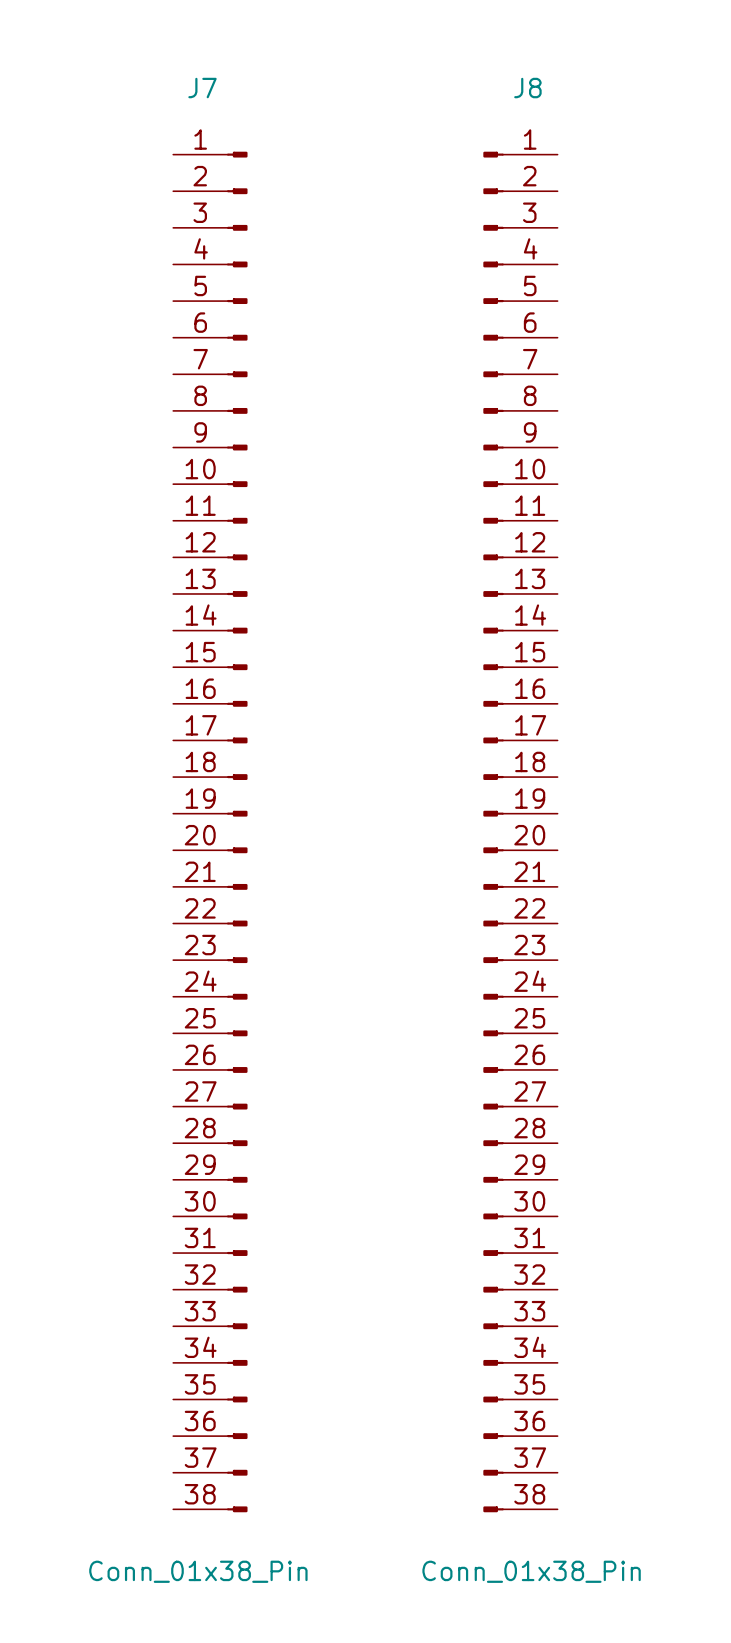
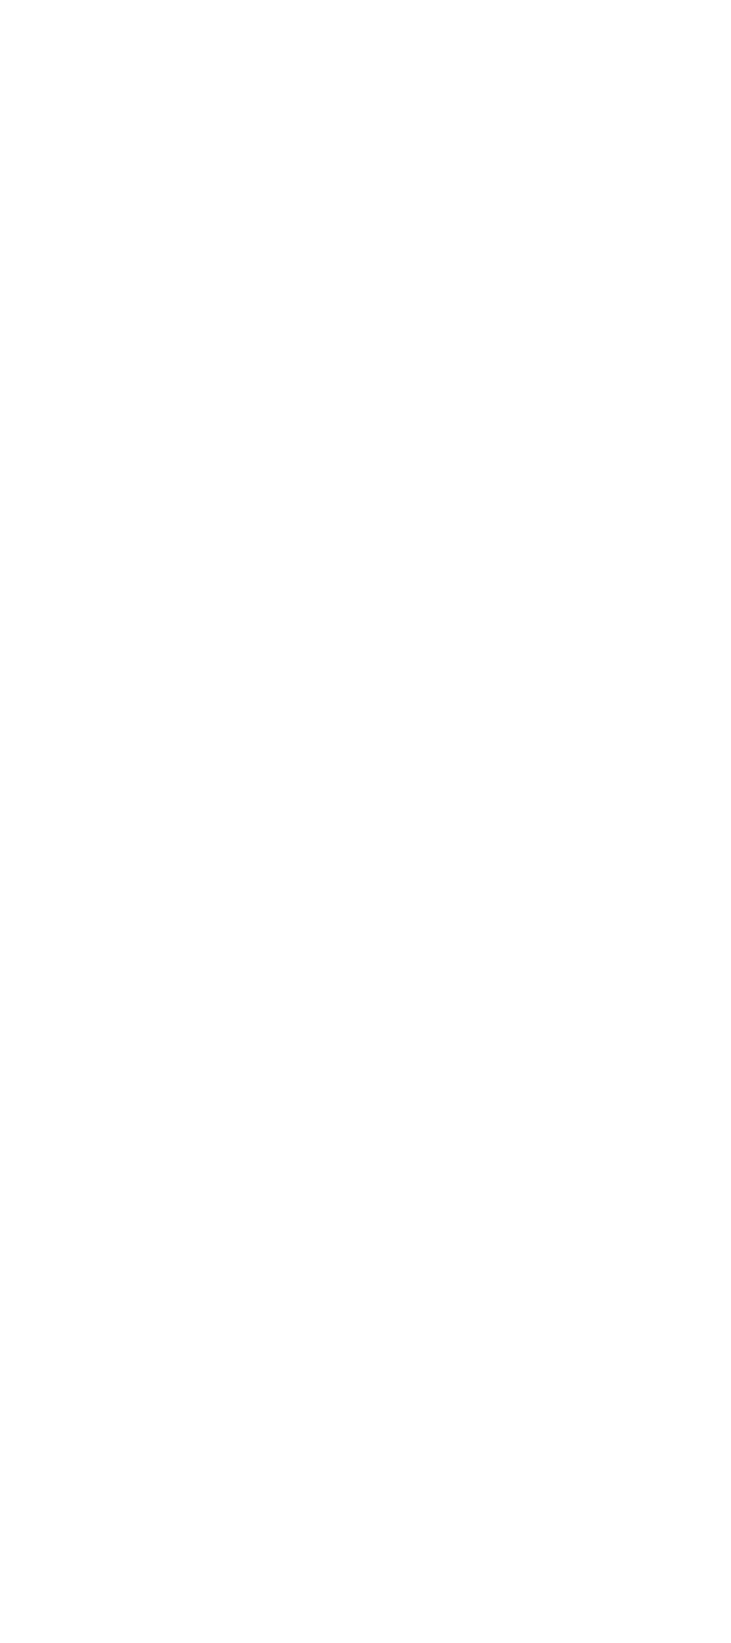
J7: Conn_01x38_Pin (210, 831) -> none
J8: Conn_01x38_Pin (520, 831) -> none

